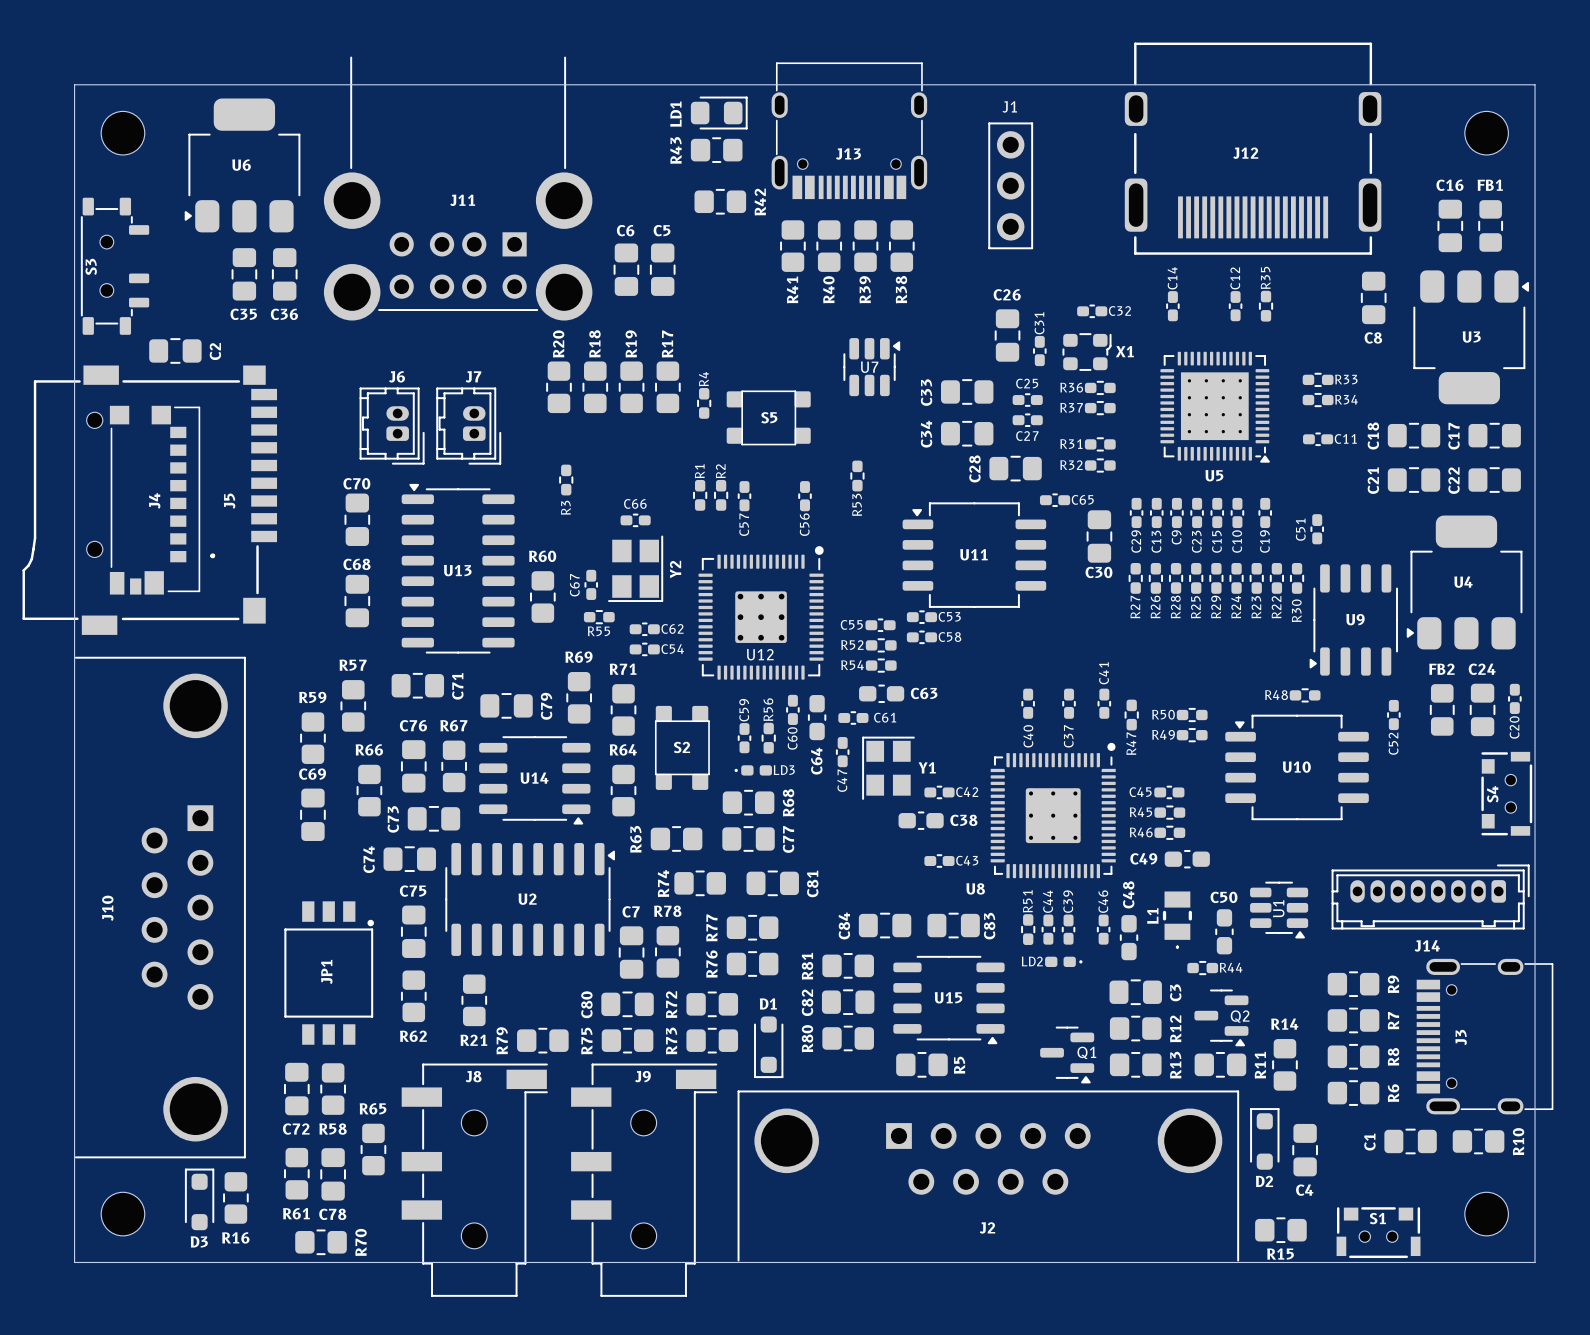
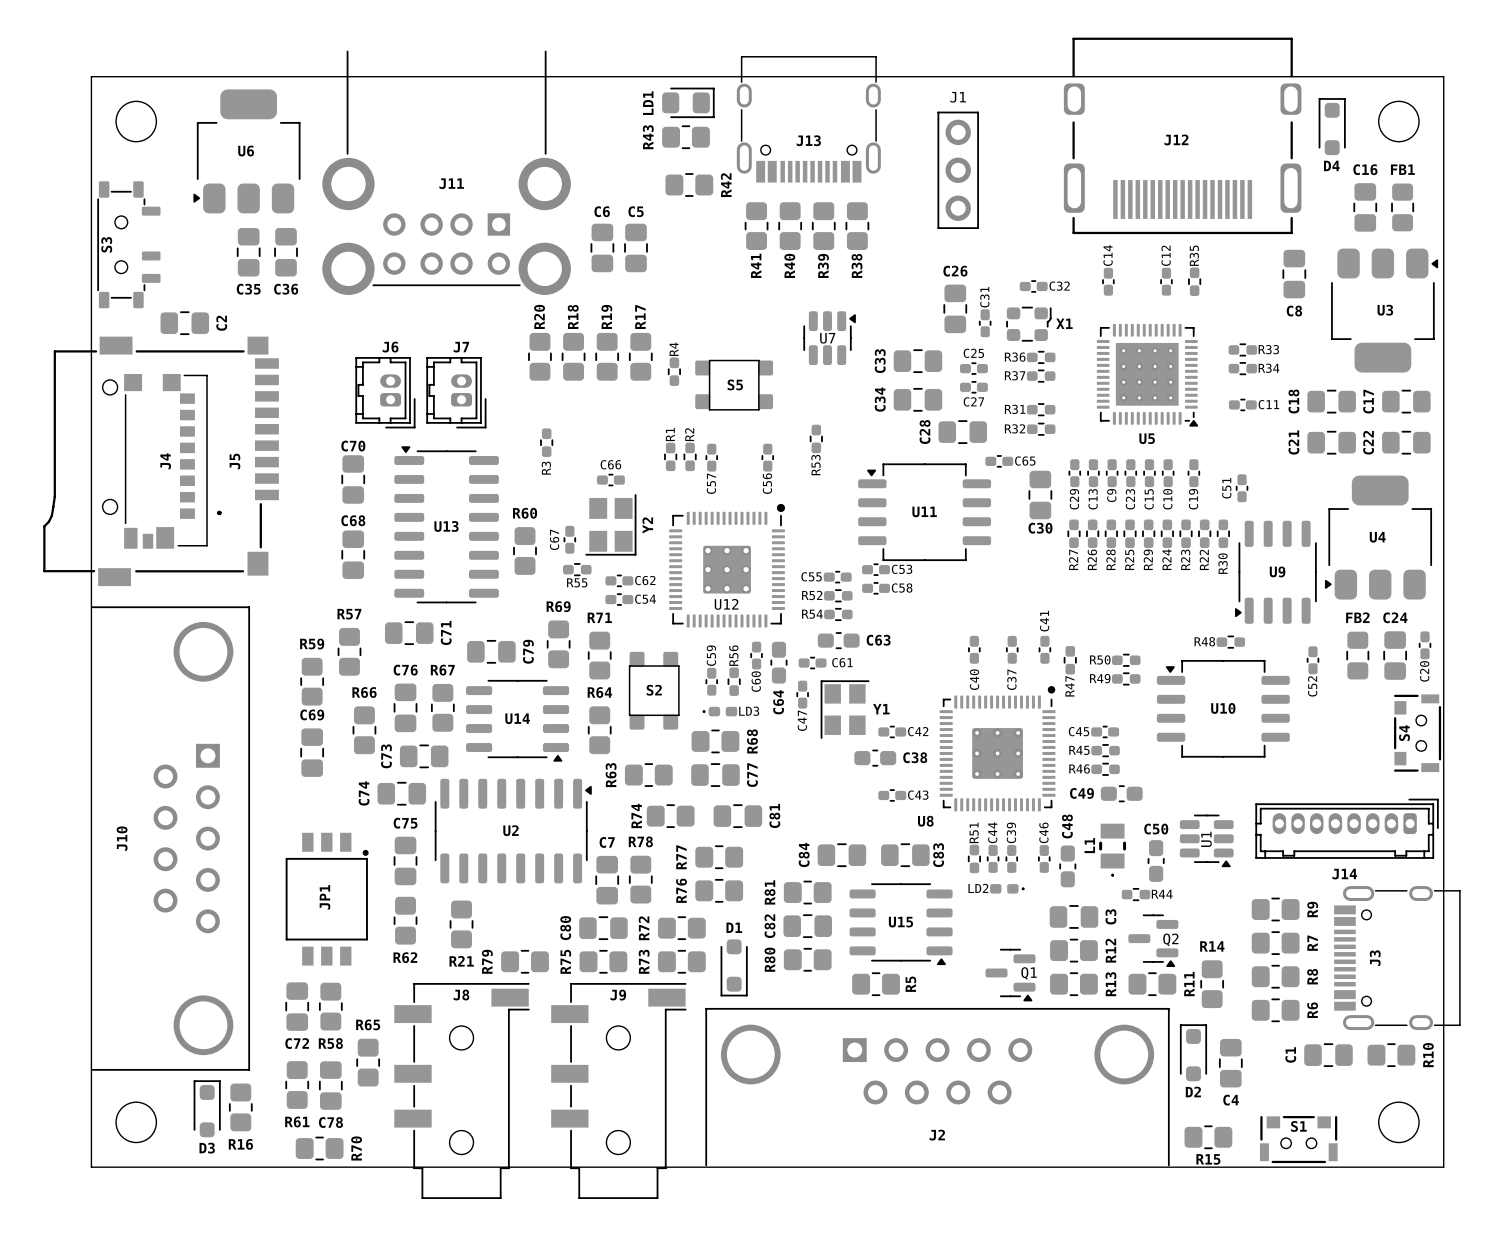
D4: none -> (1332, 126)

